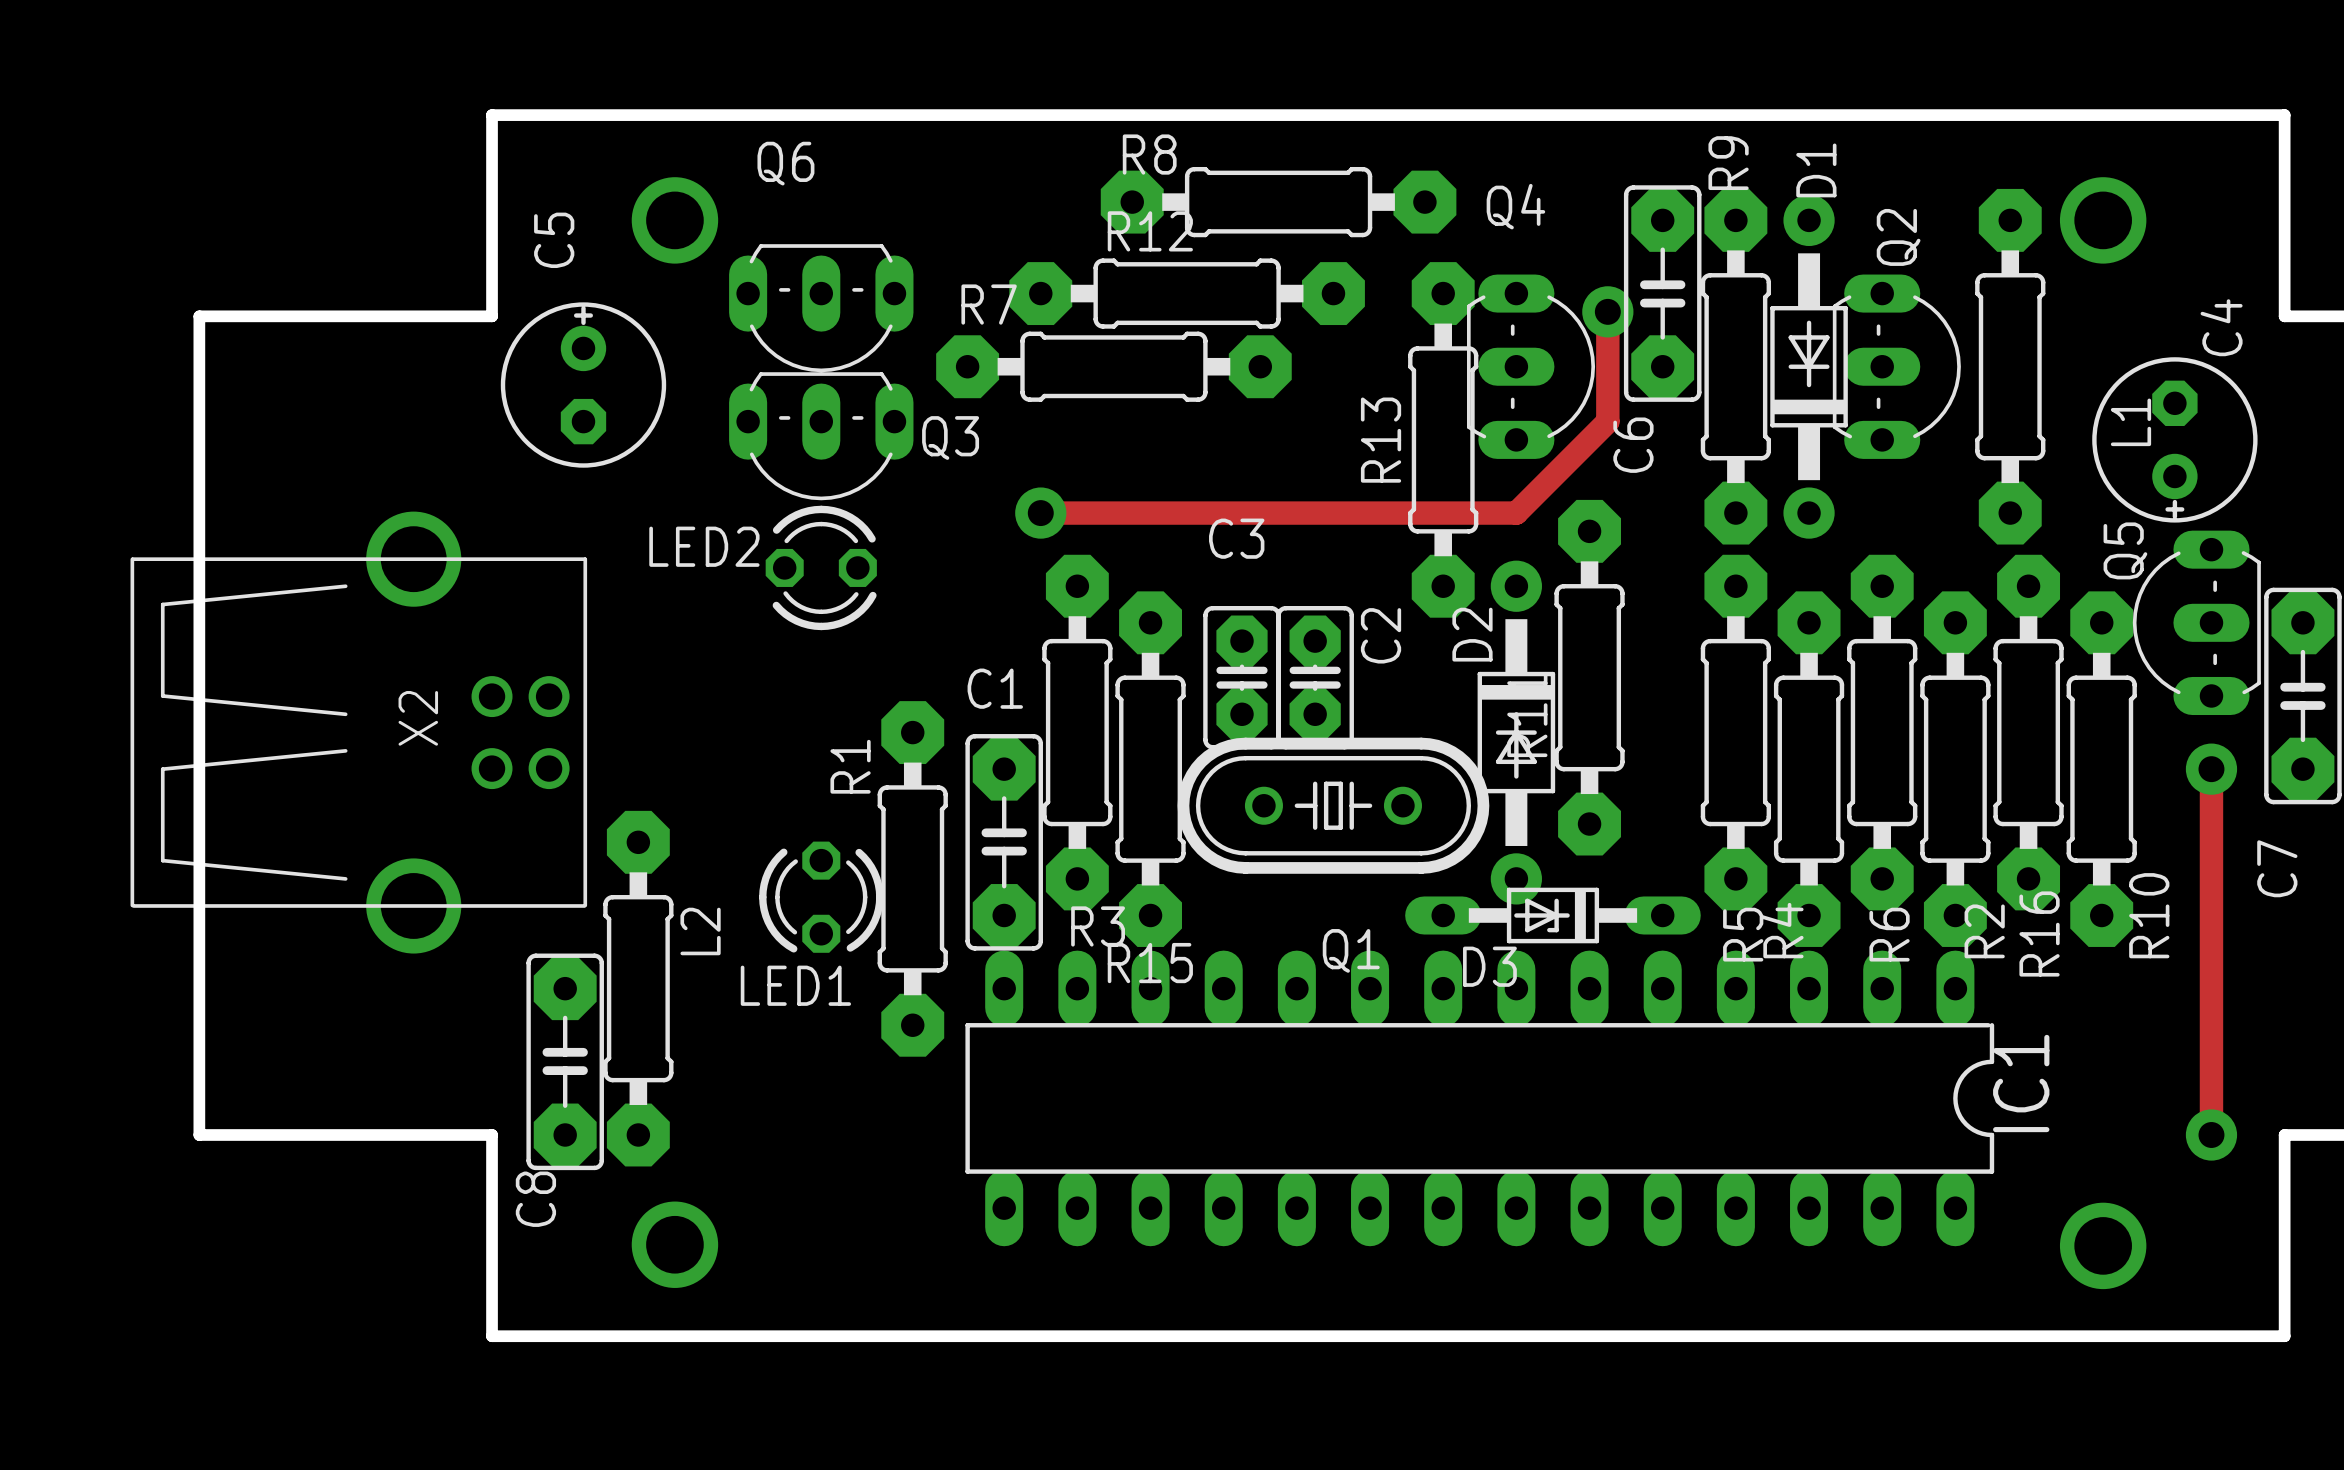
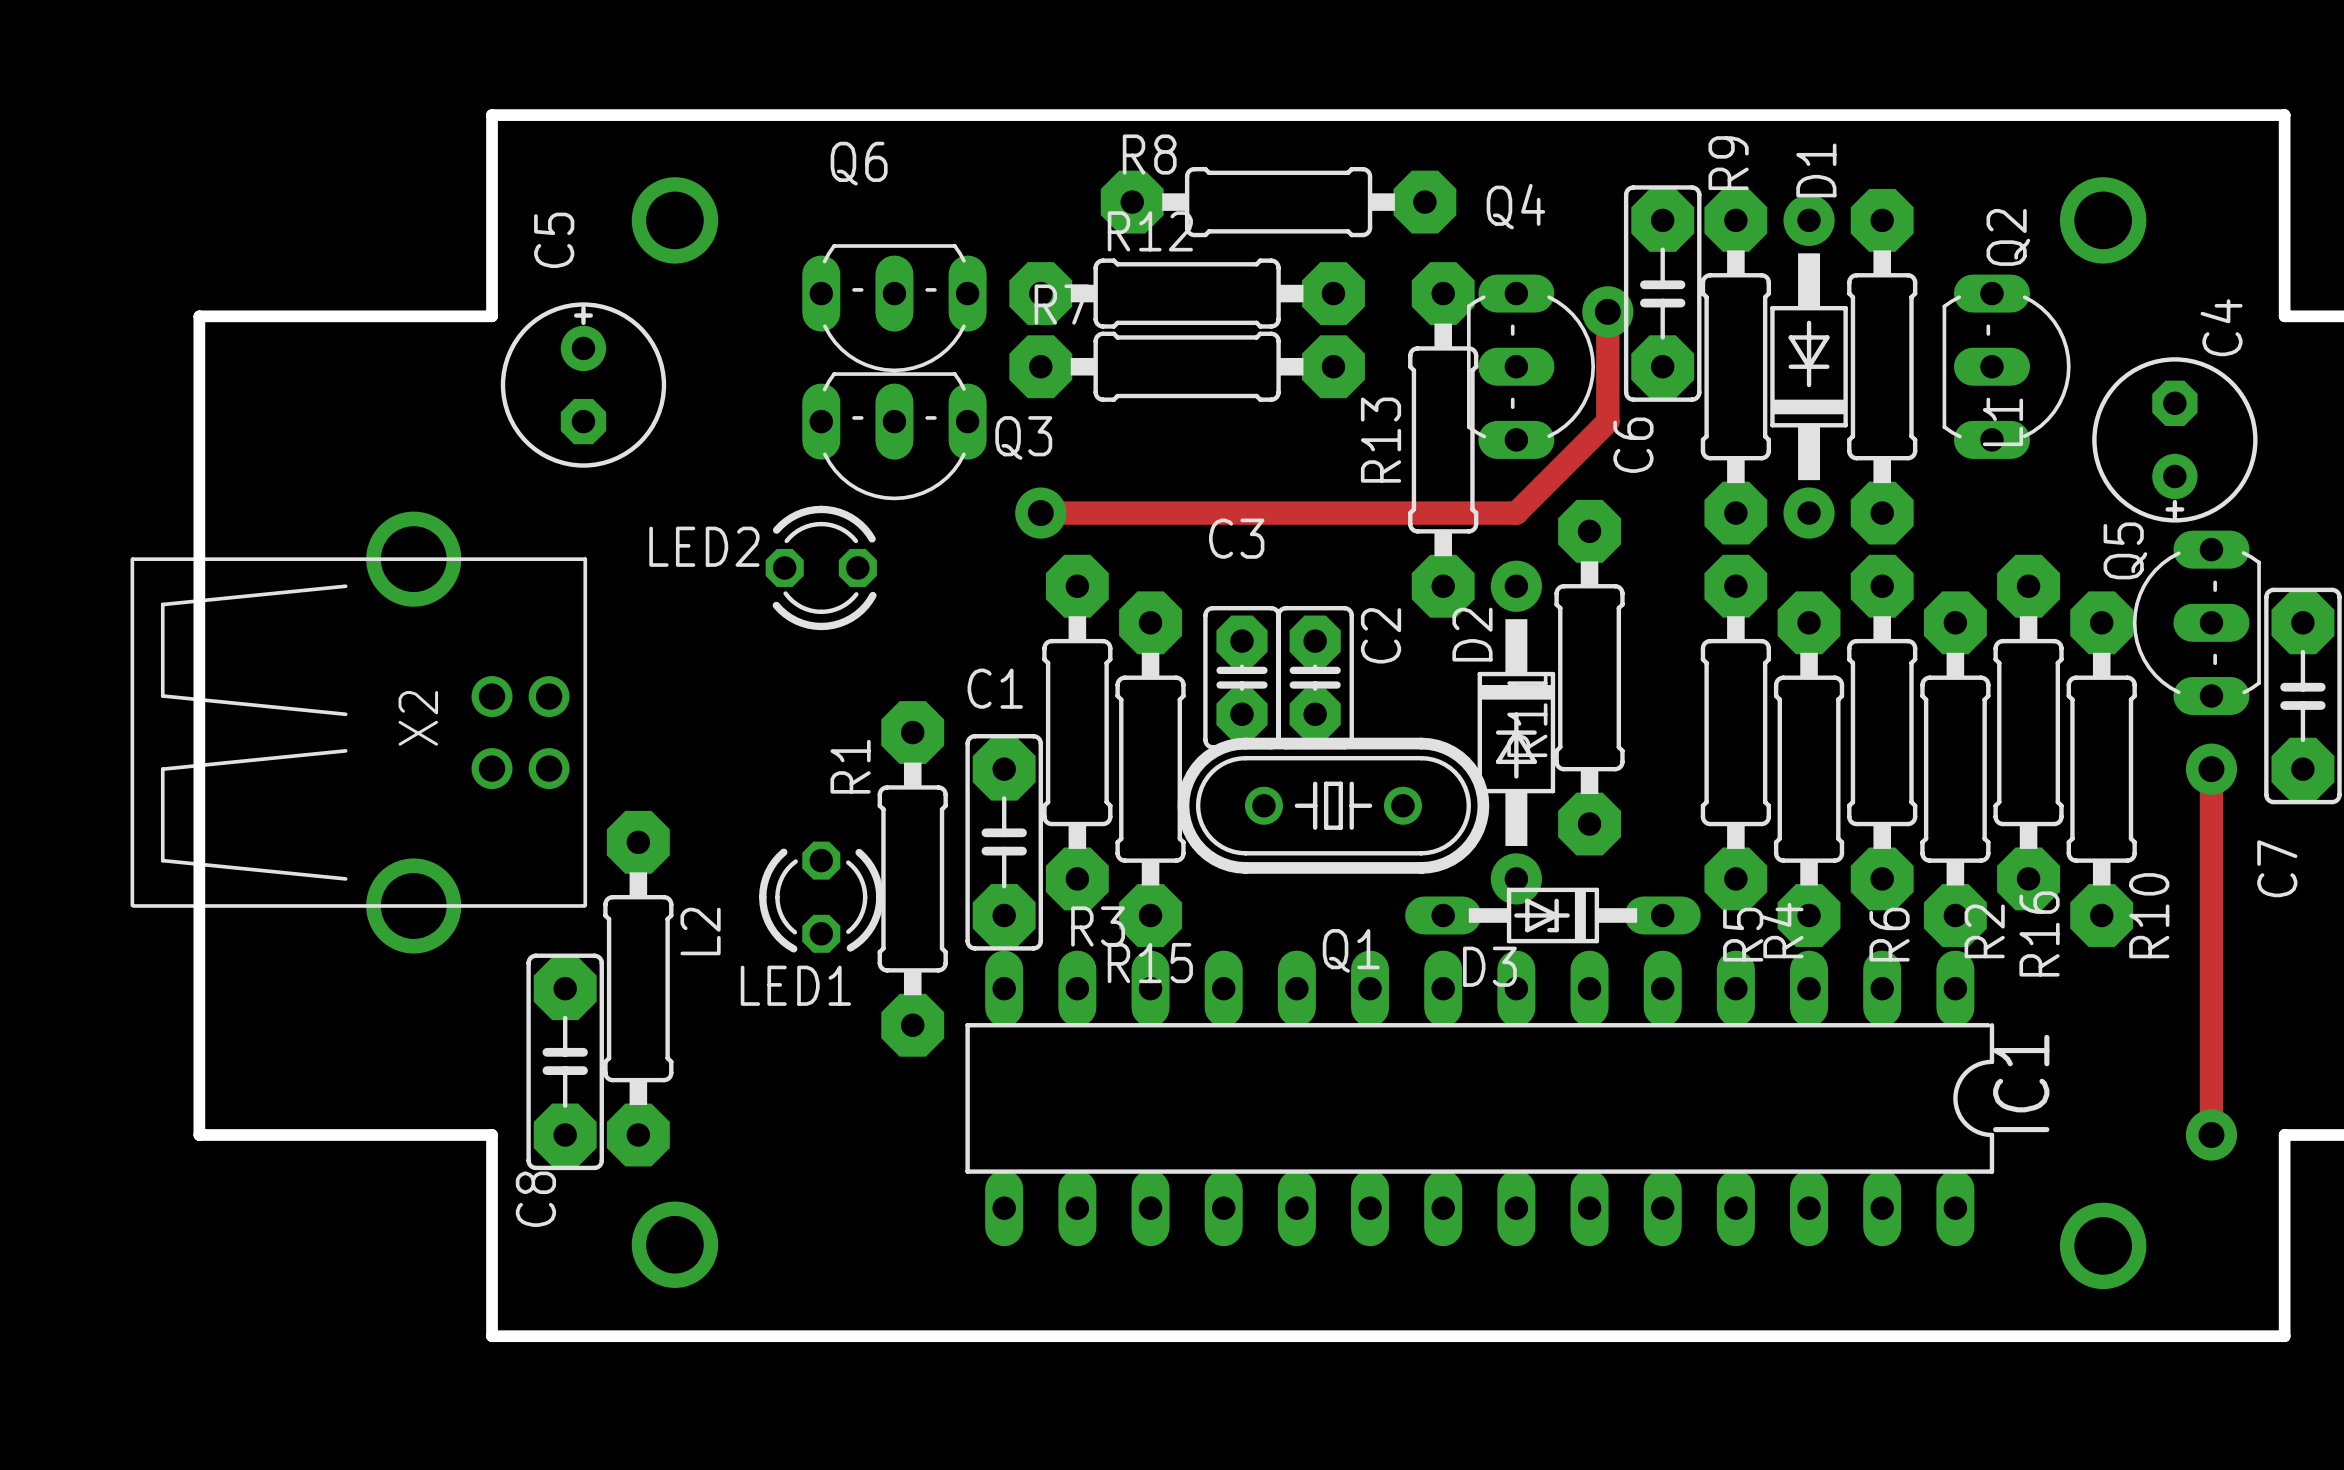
Q6 position: (821, 308) -> (894, 308)
R7 position: (1113, 366) -> (1187, 366)
Q2 position: (1896, 366) -> (2006, 366)
L1 position: (2010, 366) -> (1882, 366)
Q3 position: (821, 436) -> (894, 436)

